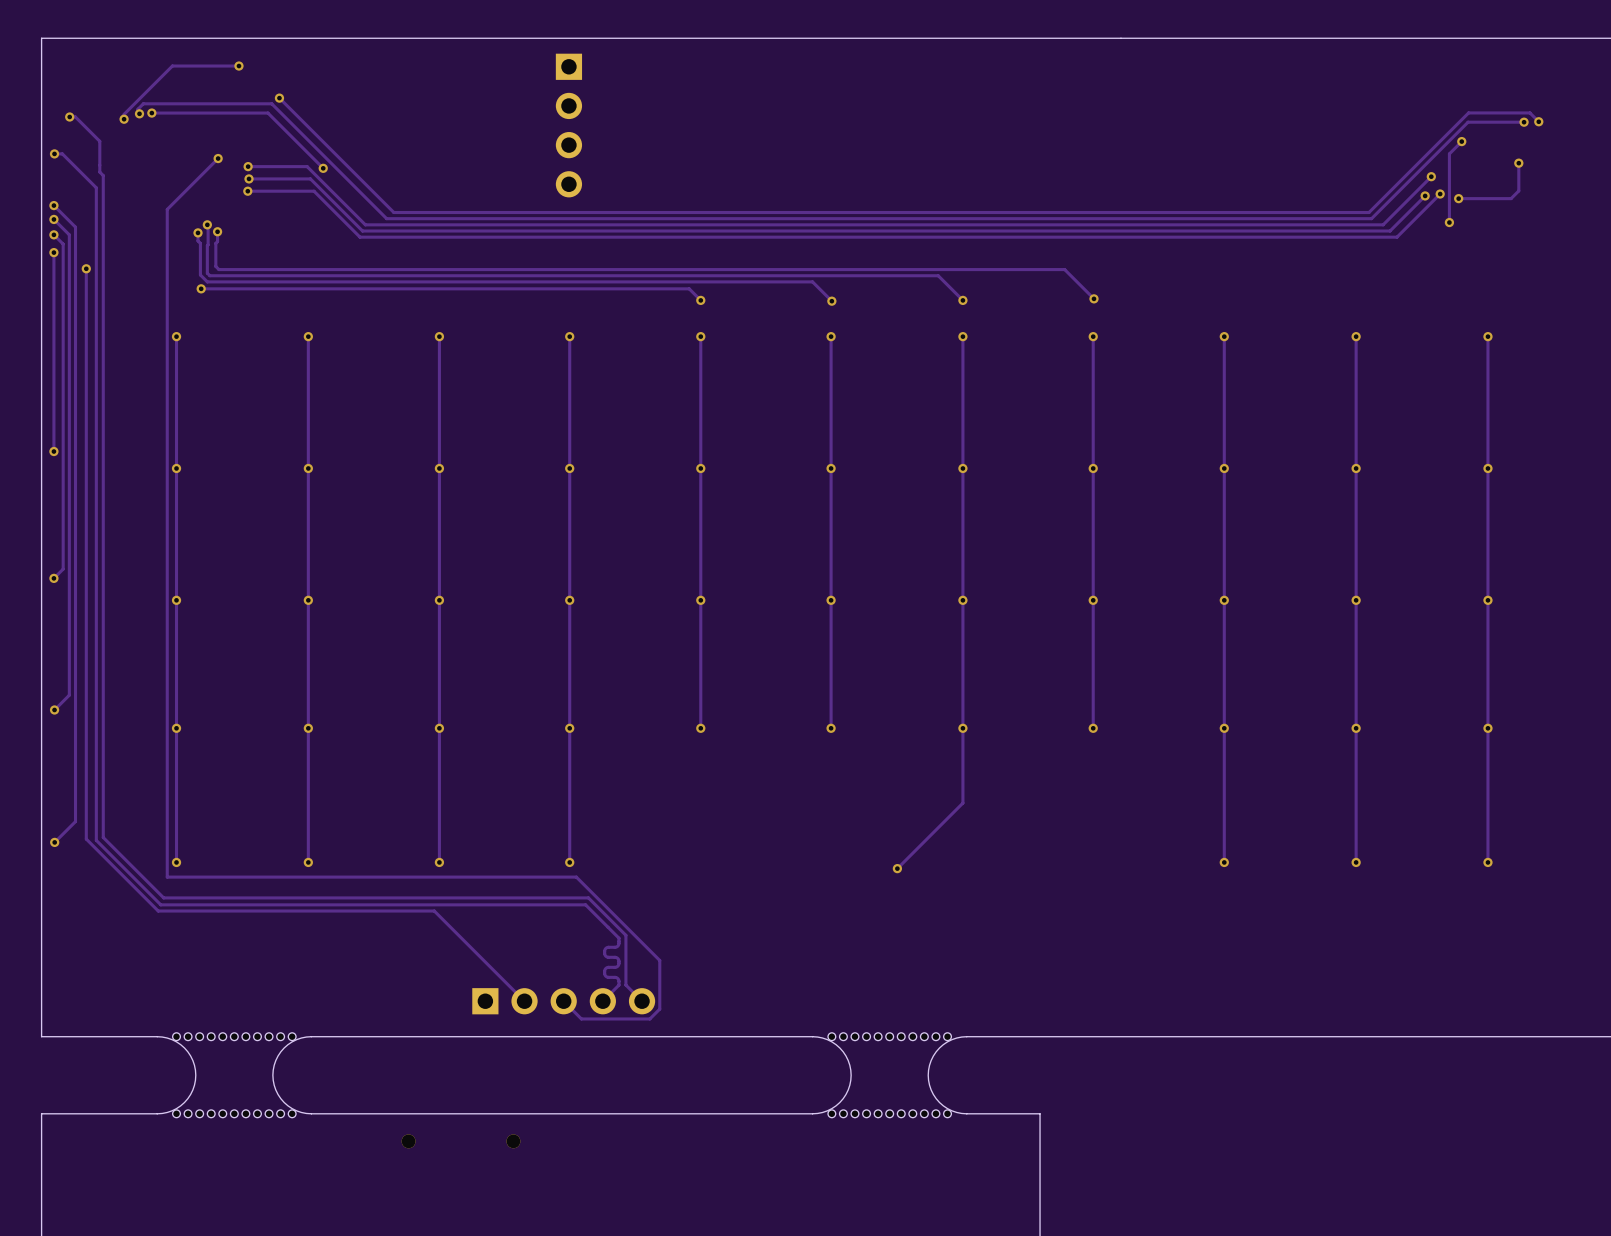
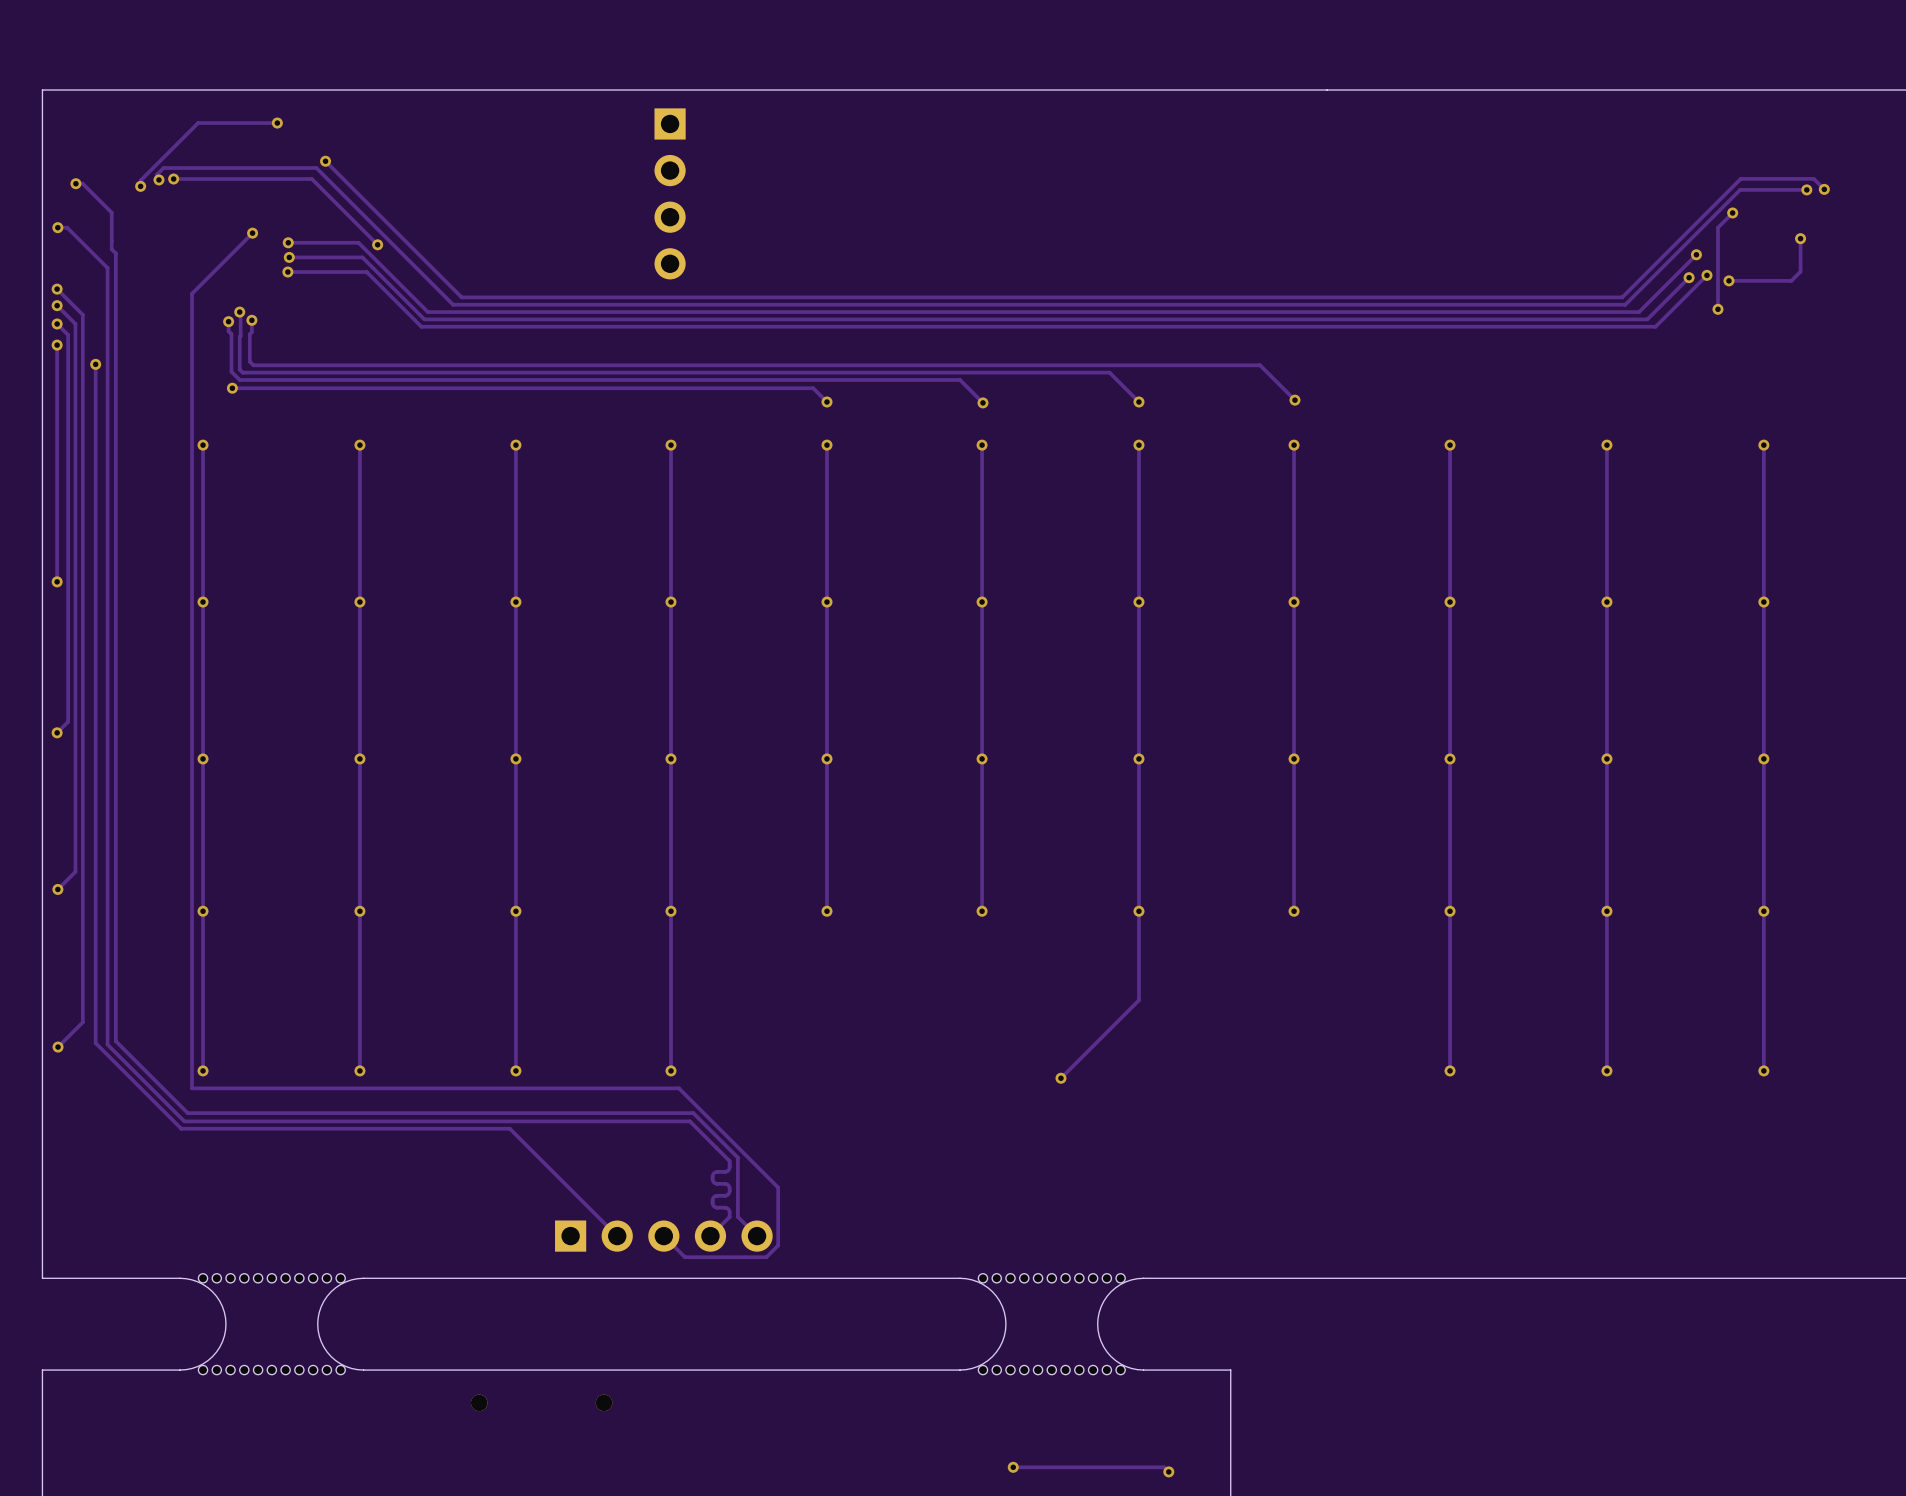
track: none -> (1013, 1467) (1164, 1467) (1168, 1471)
via: none -> (1013, 1467)
via: none -> (1168, 1471)

